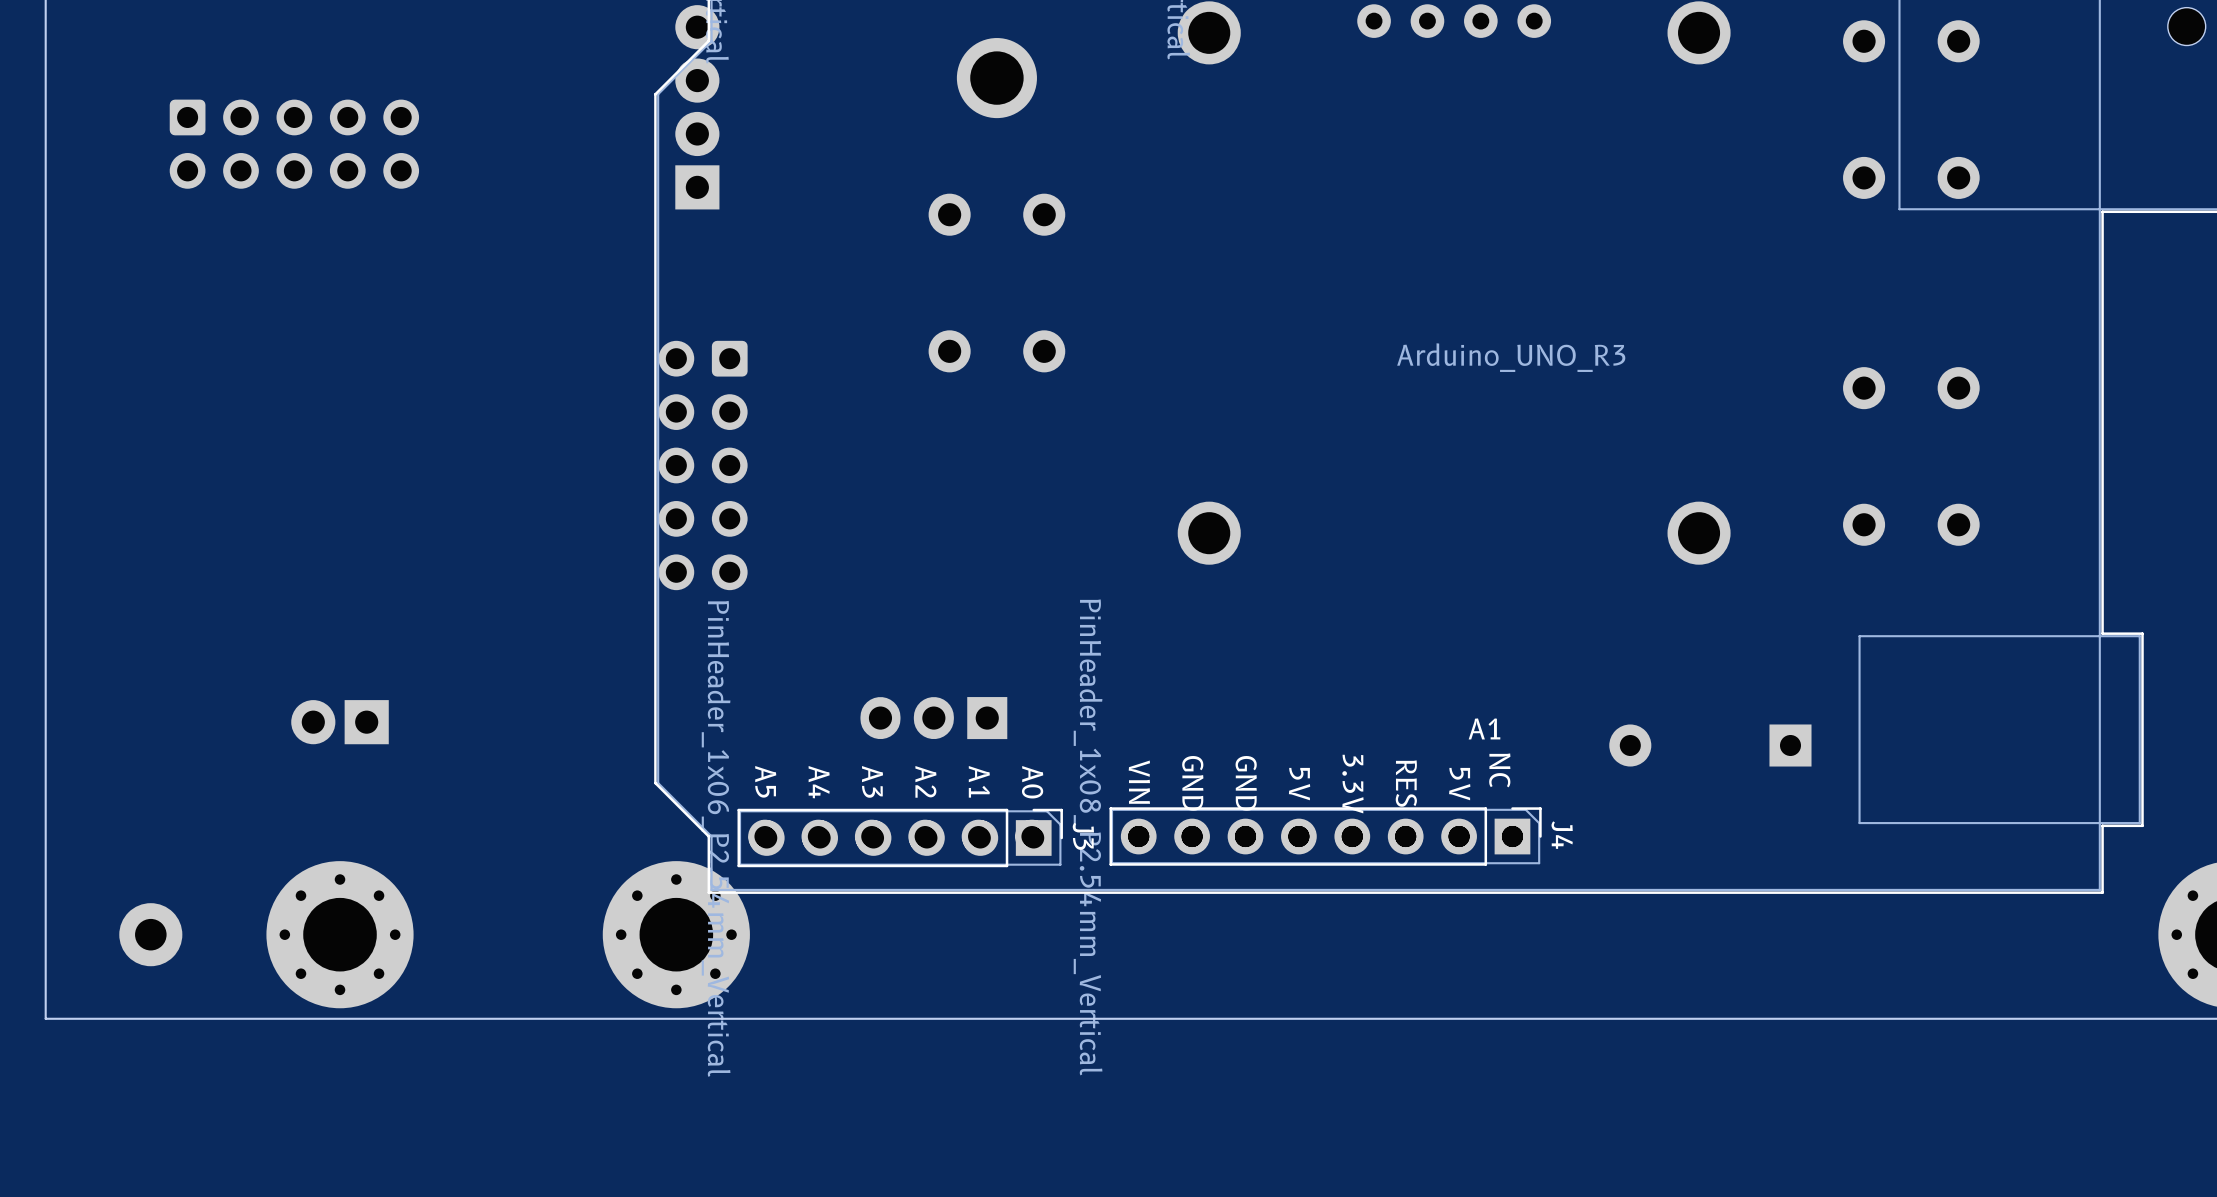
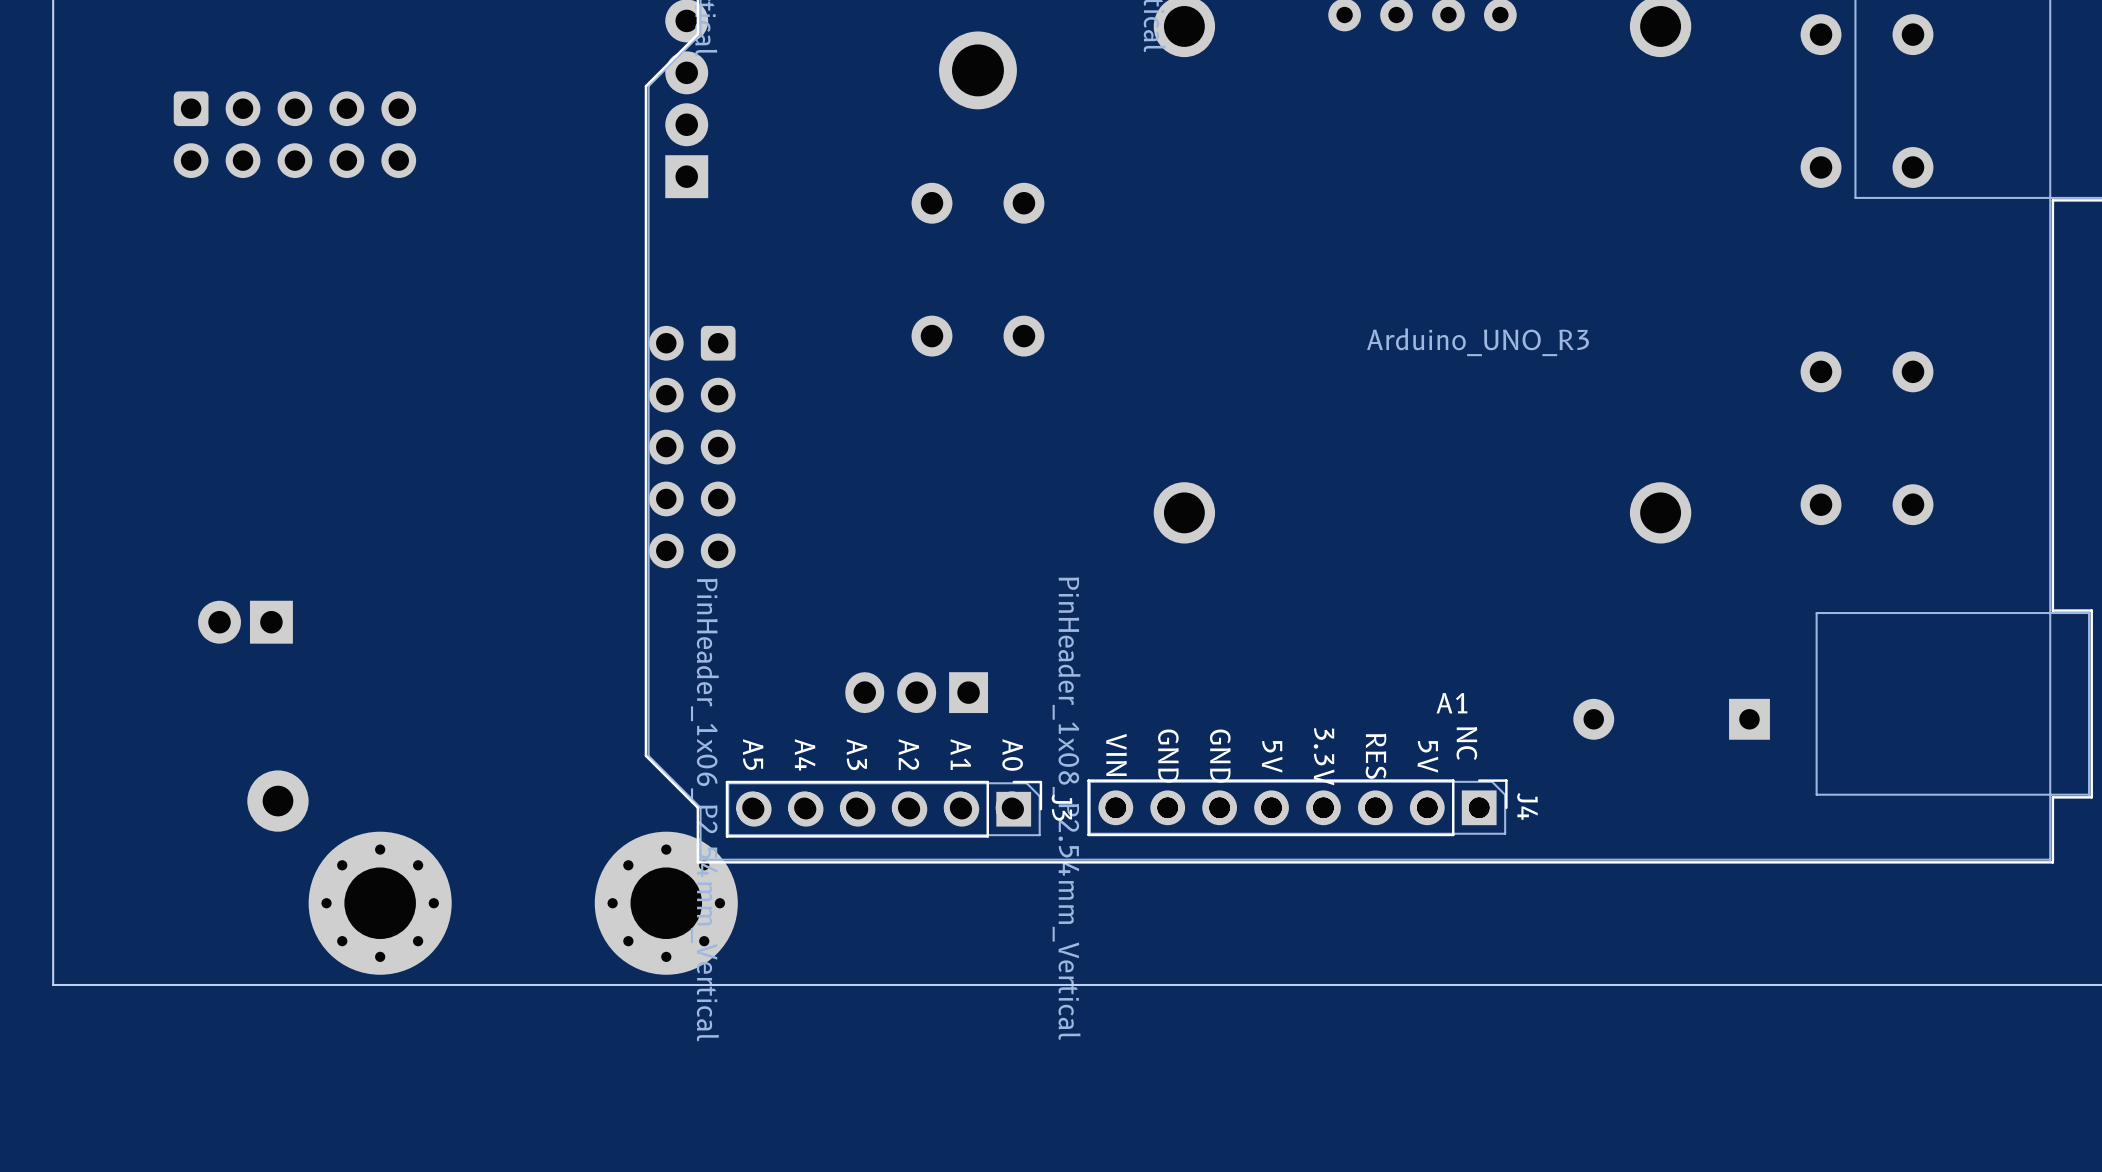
part position: (340, 722) -> (245, 622)
part position: (150, 934) -> (277, 801)
part position: (340, 934) -> (380, 903)

